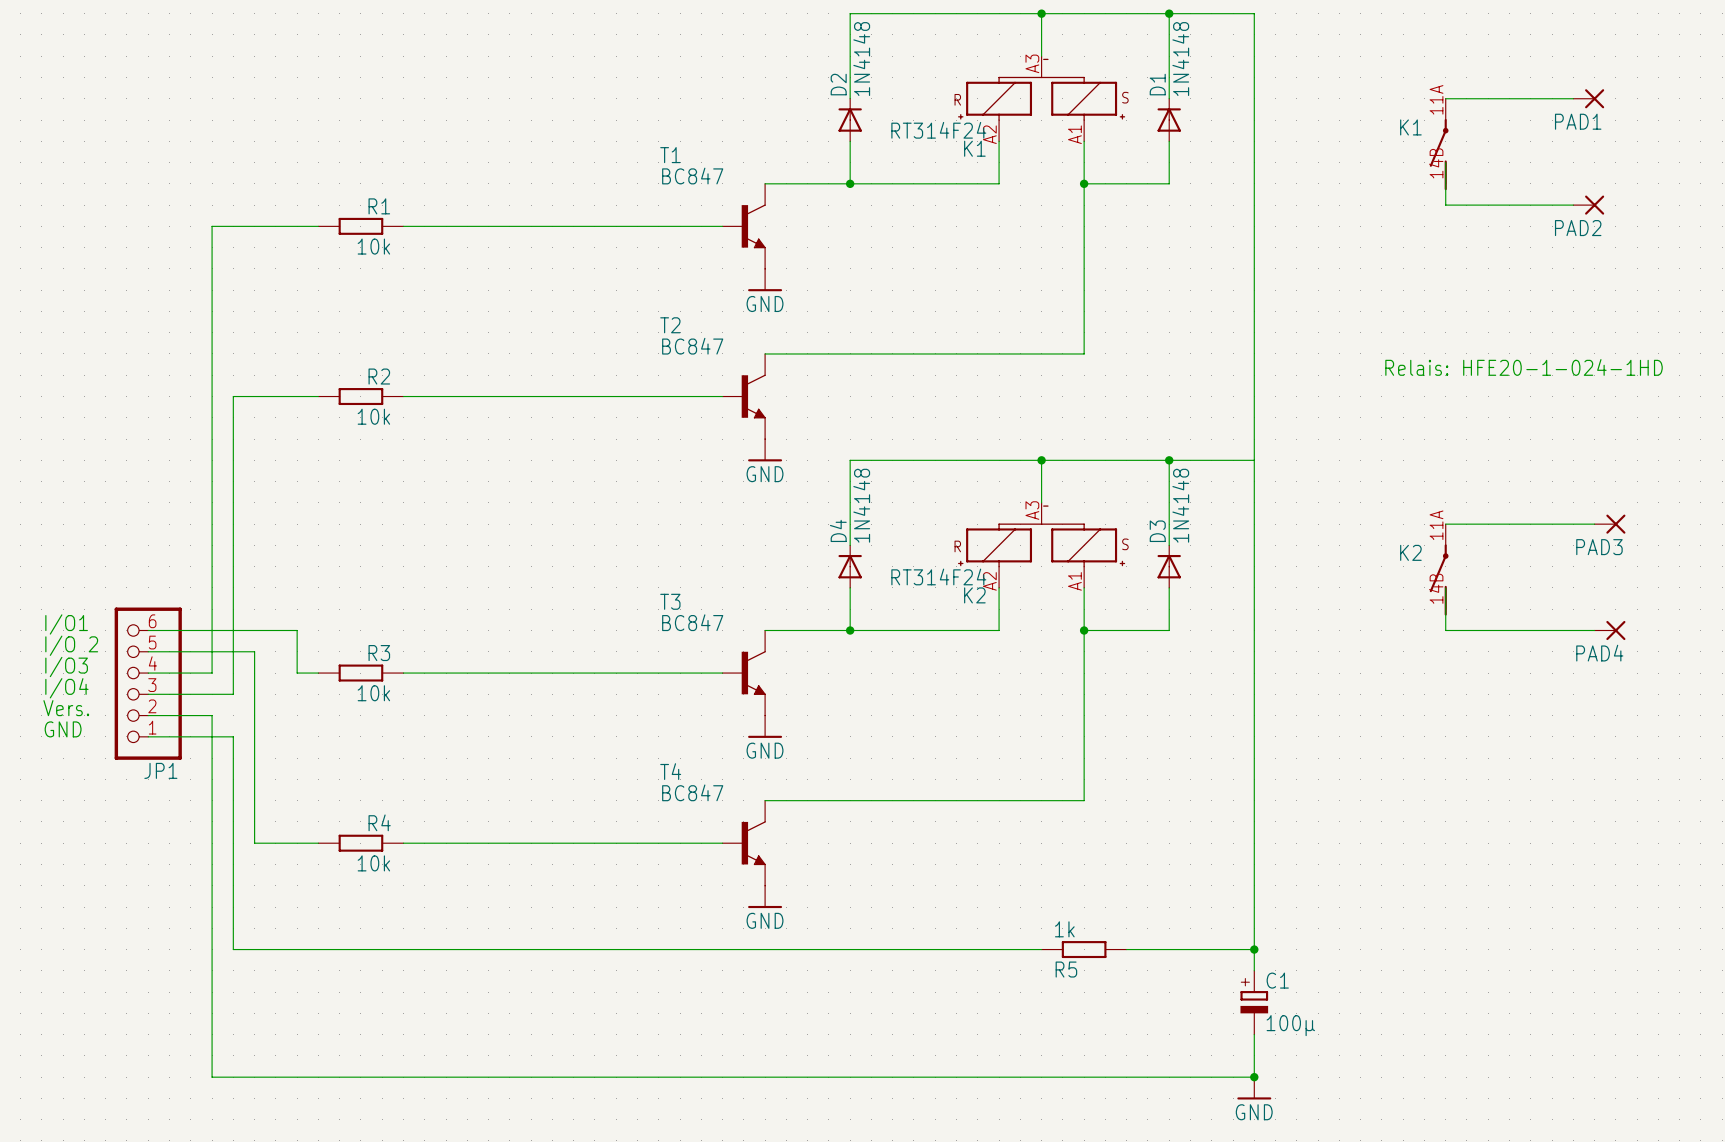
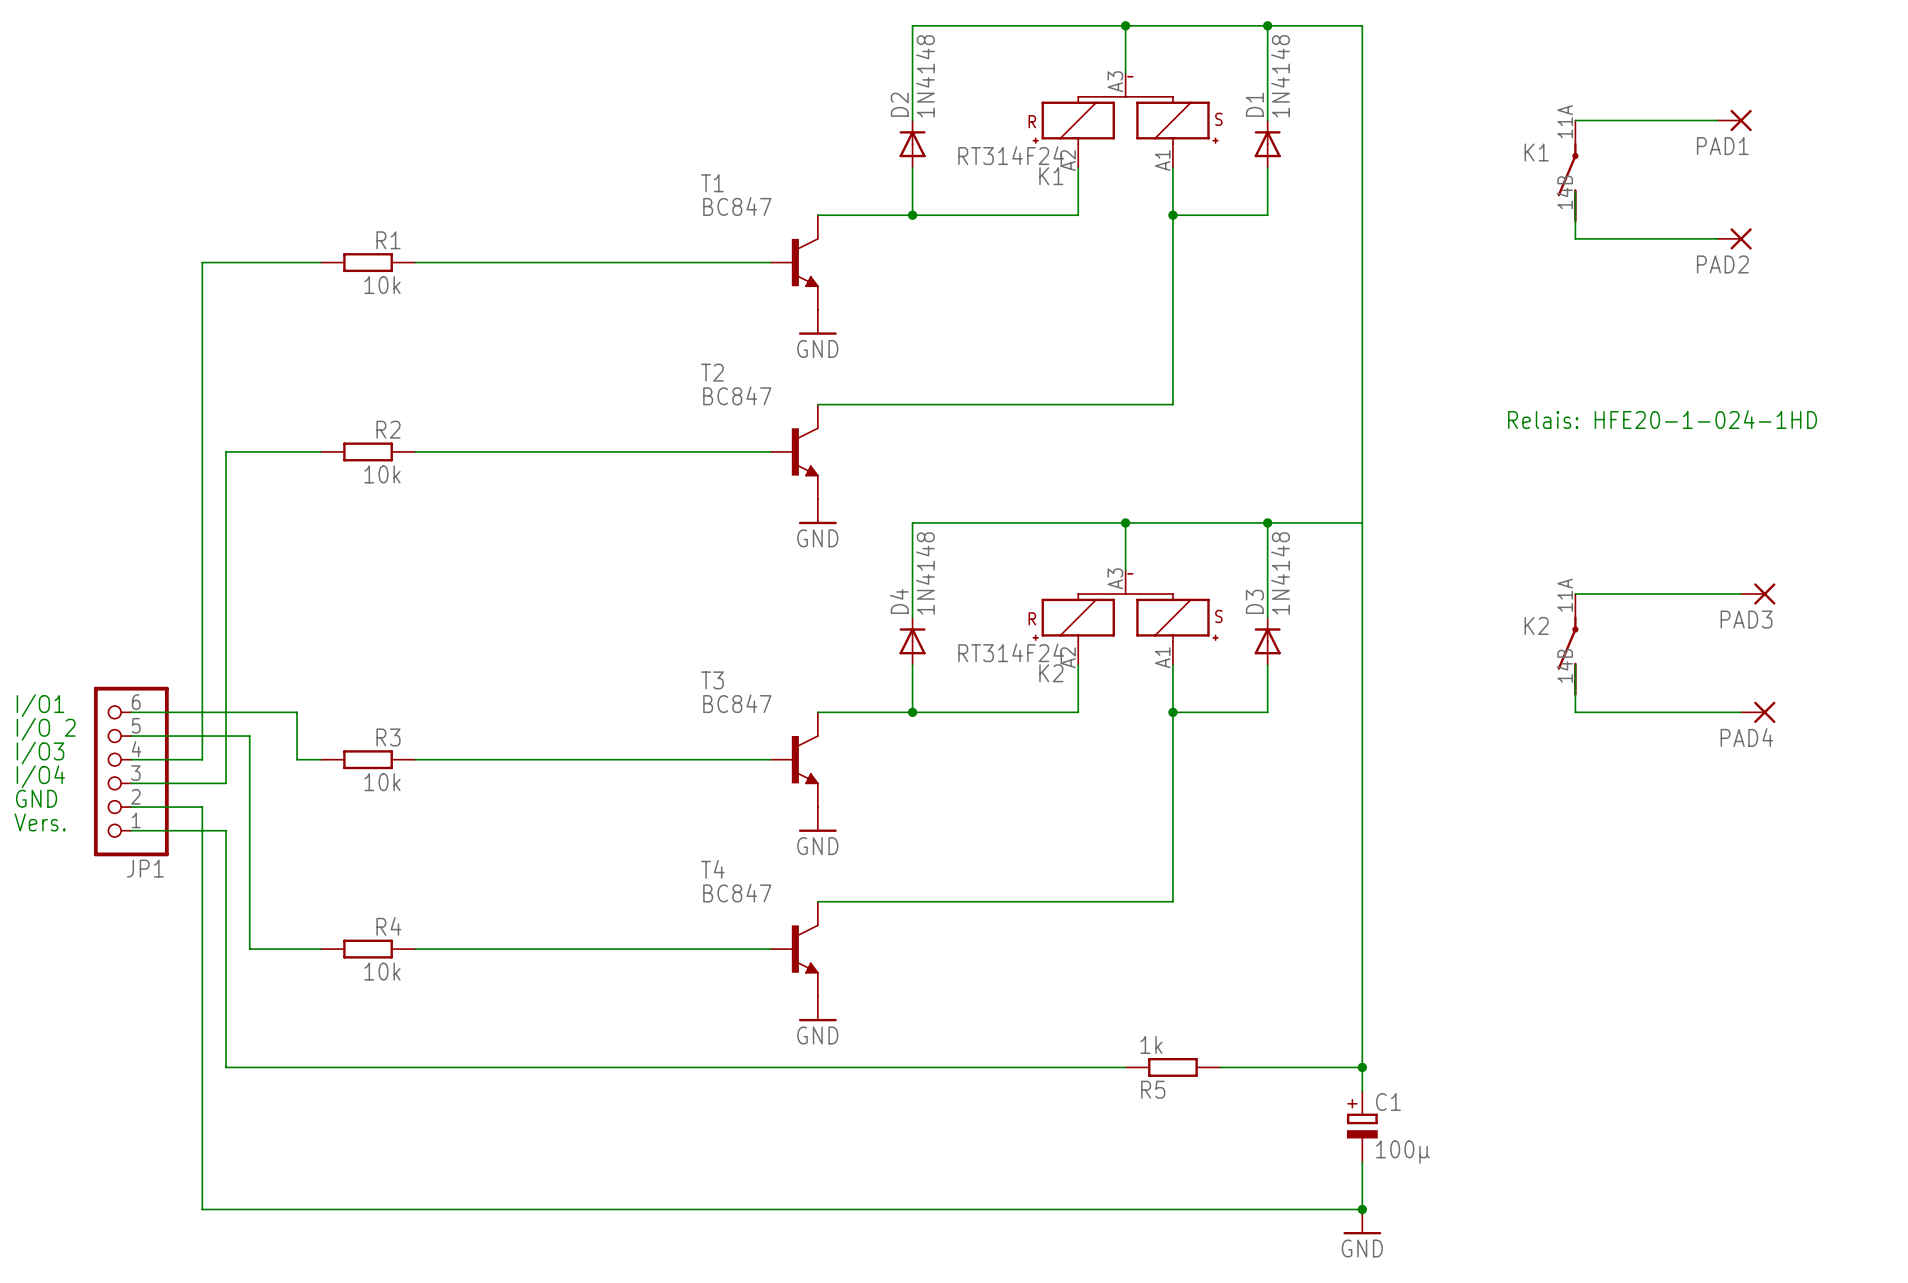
text: Vers. (66, 708) -> GND (36, 798)
text: GND (63, 729) -> Vers. (40, 822)

